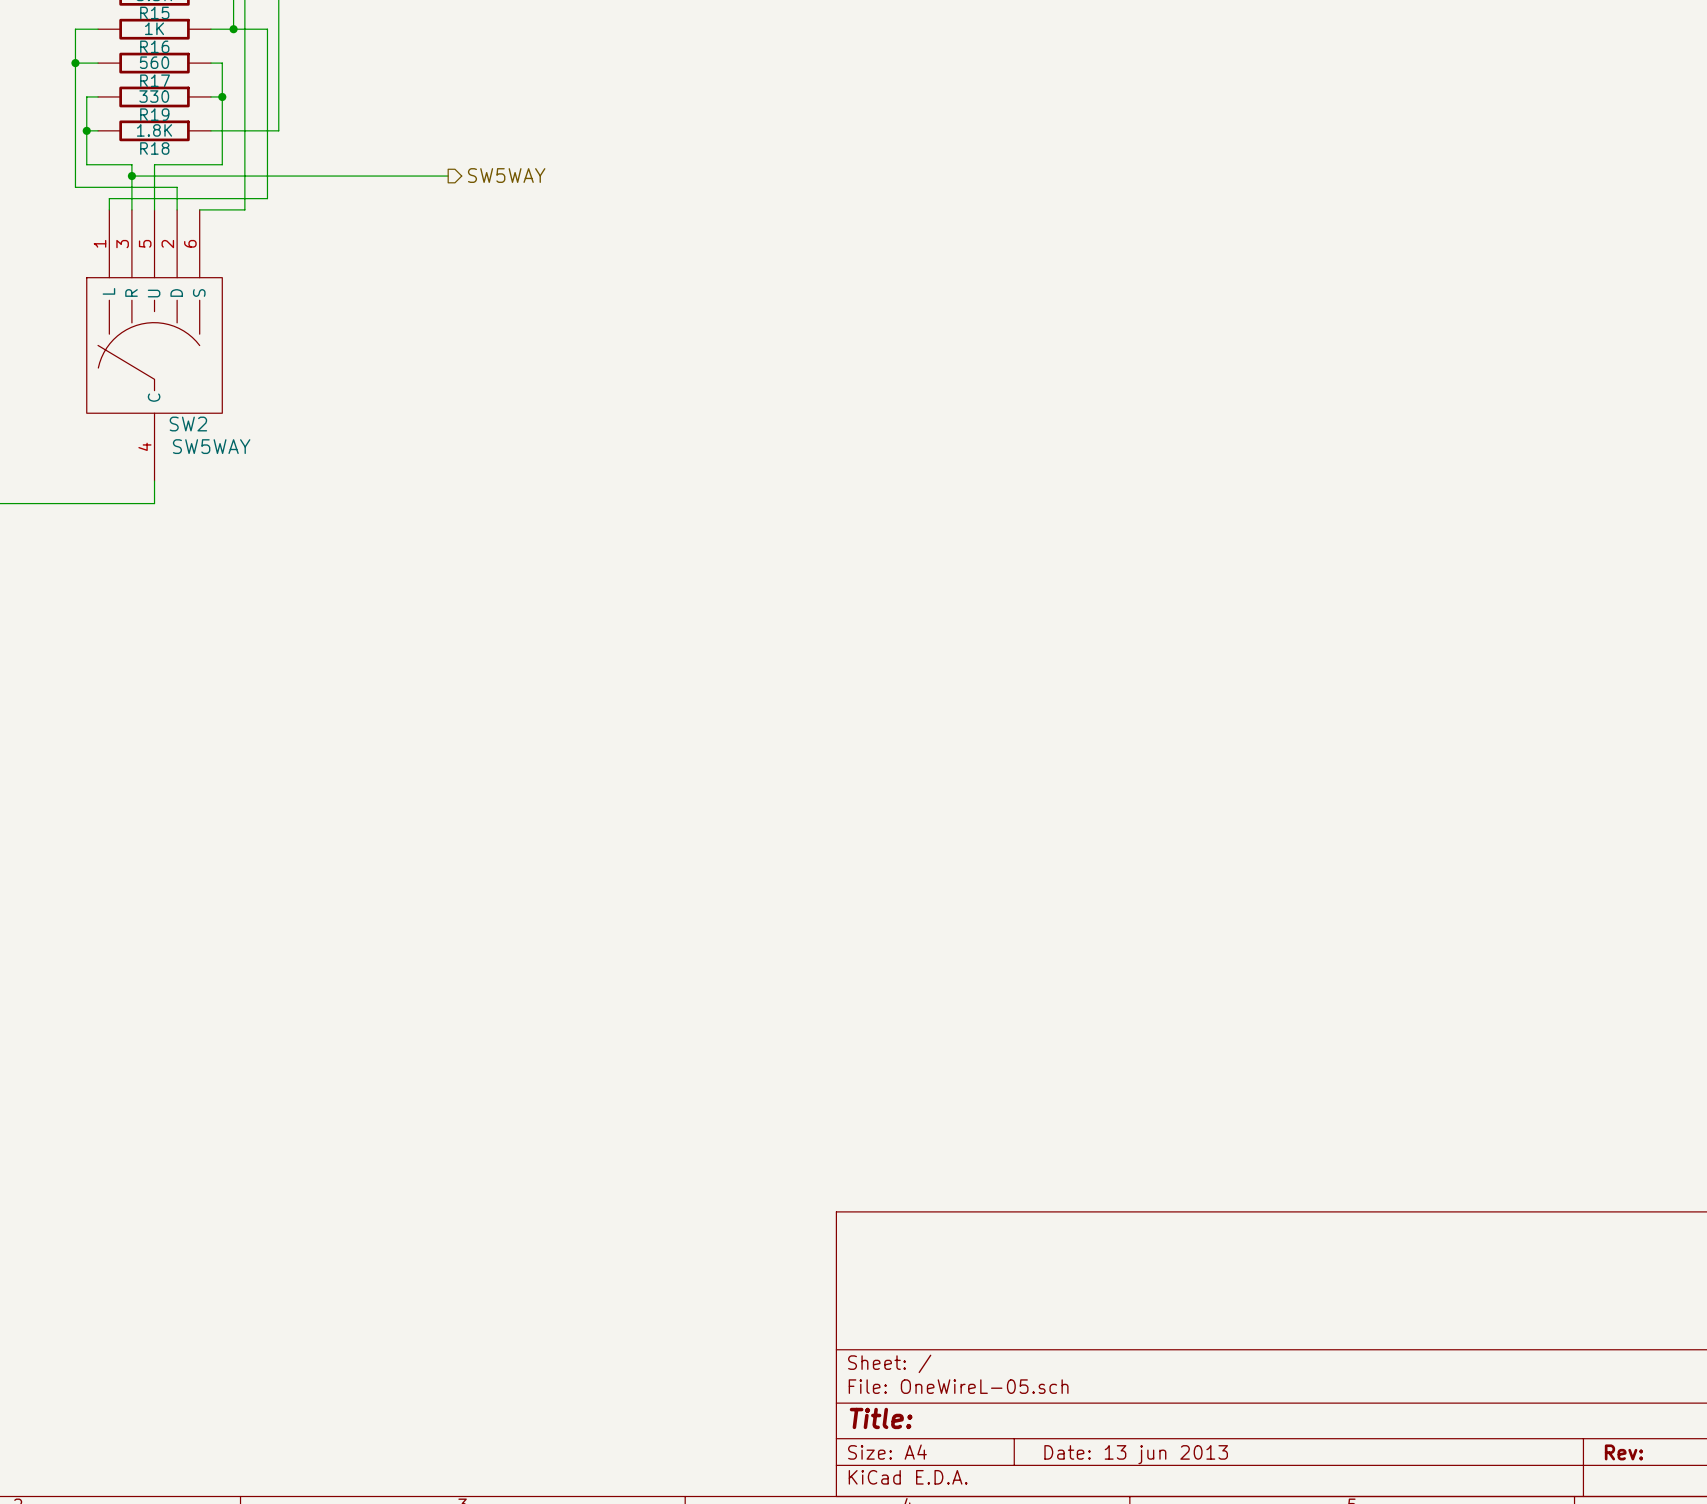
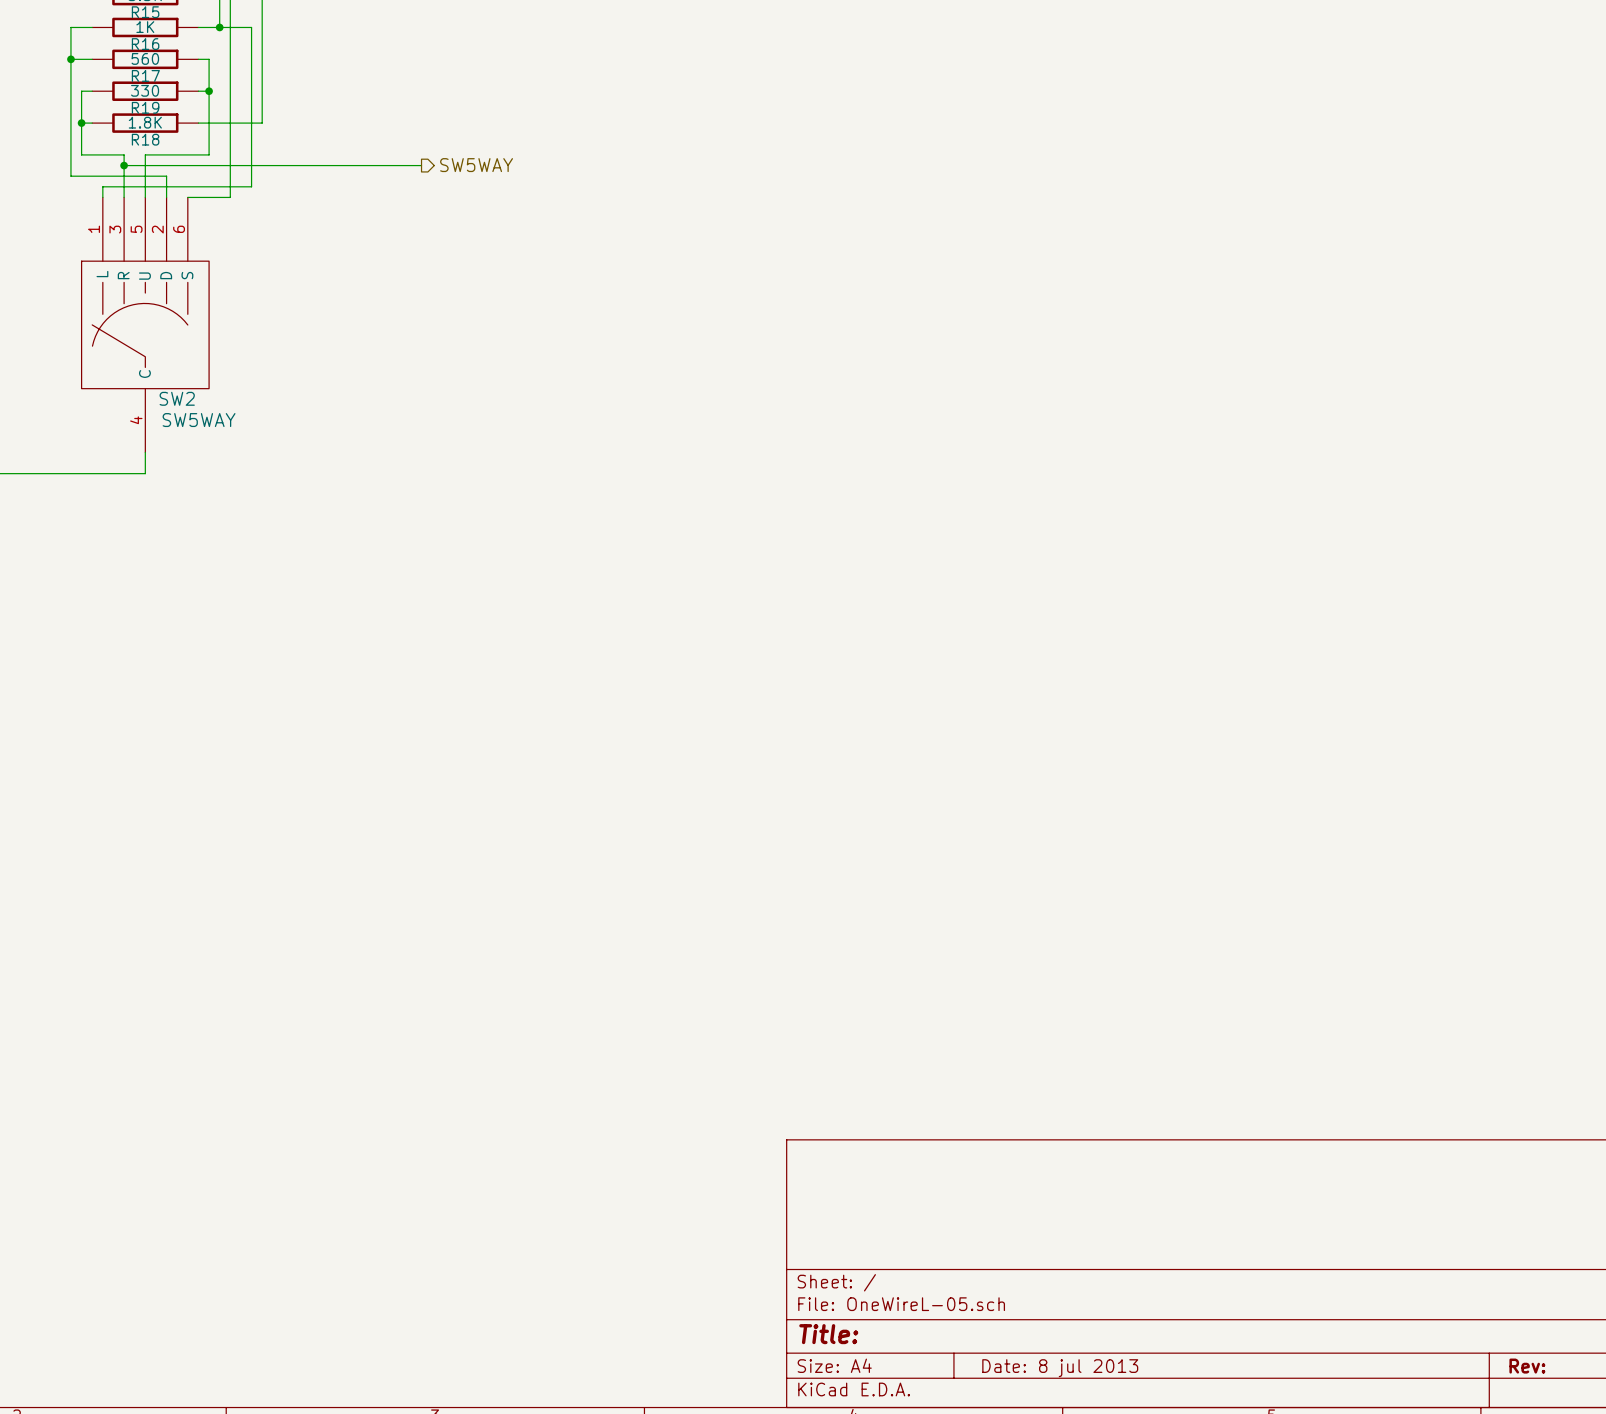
title block: Date: 13 jun 2013 (1136, 1454) -> Date: 8 jul 2013 (1060, 1368)

